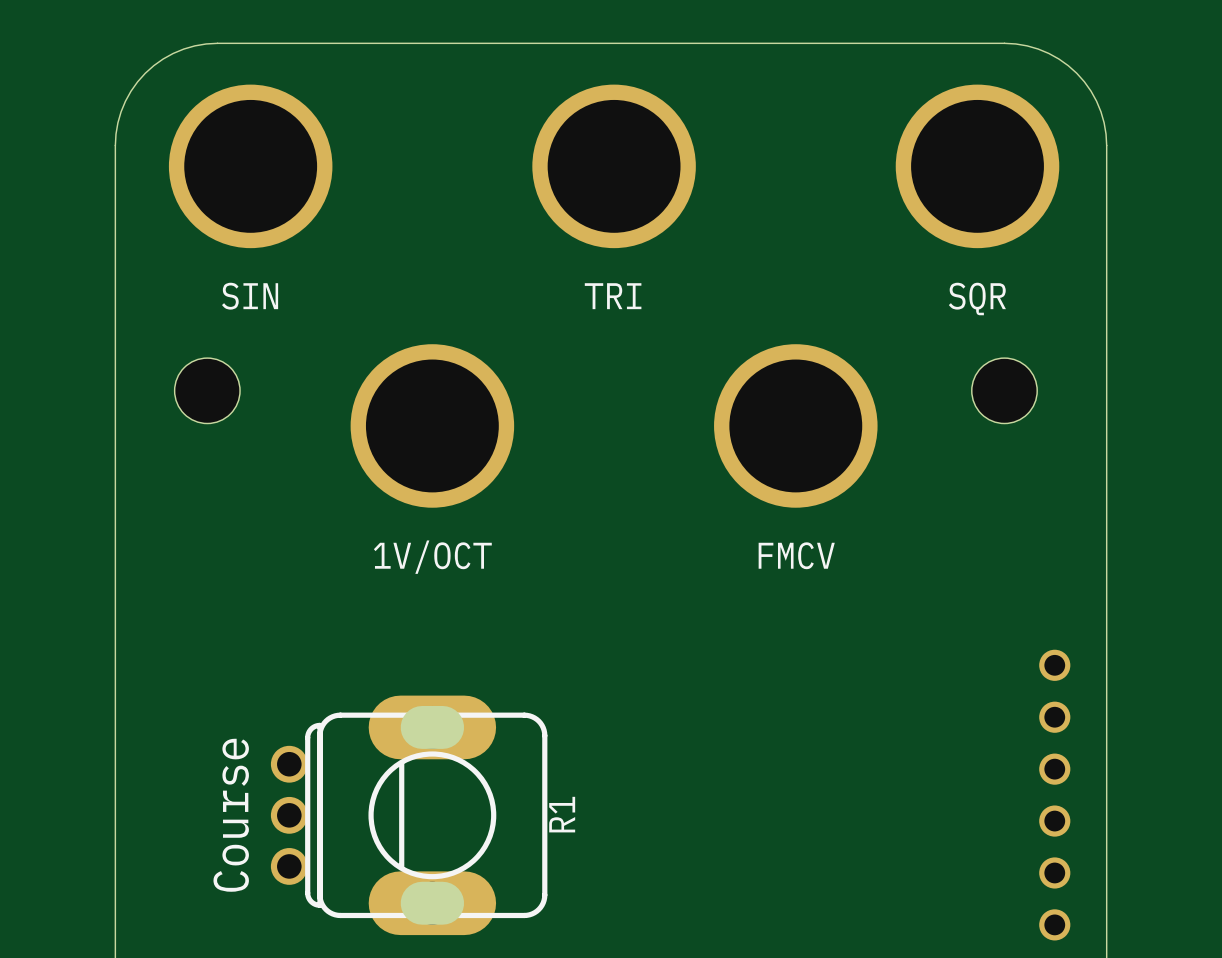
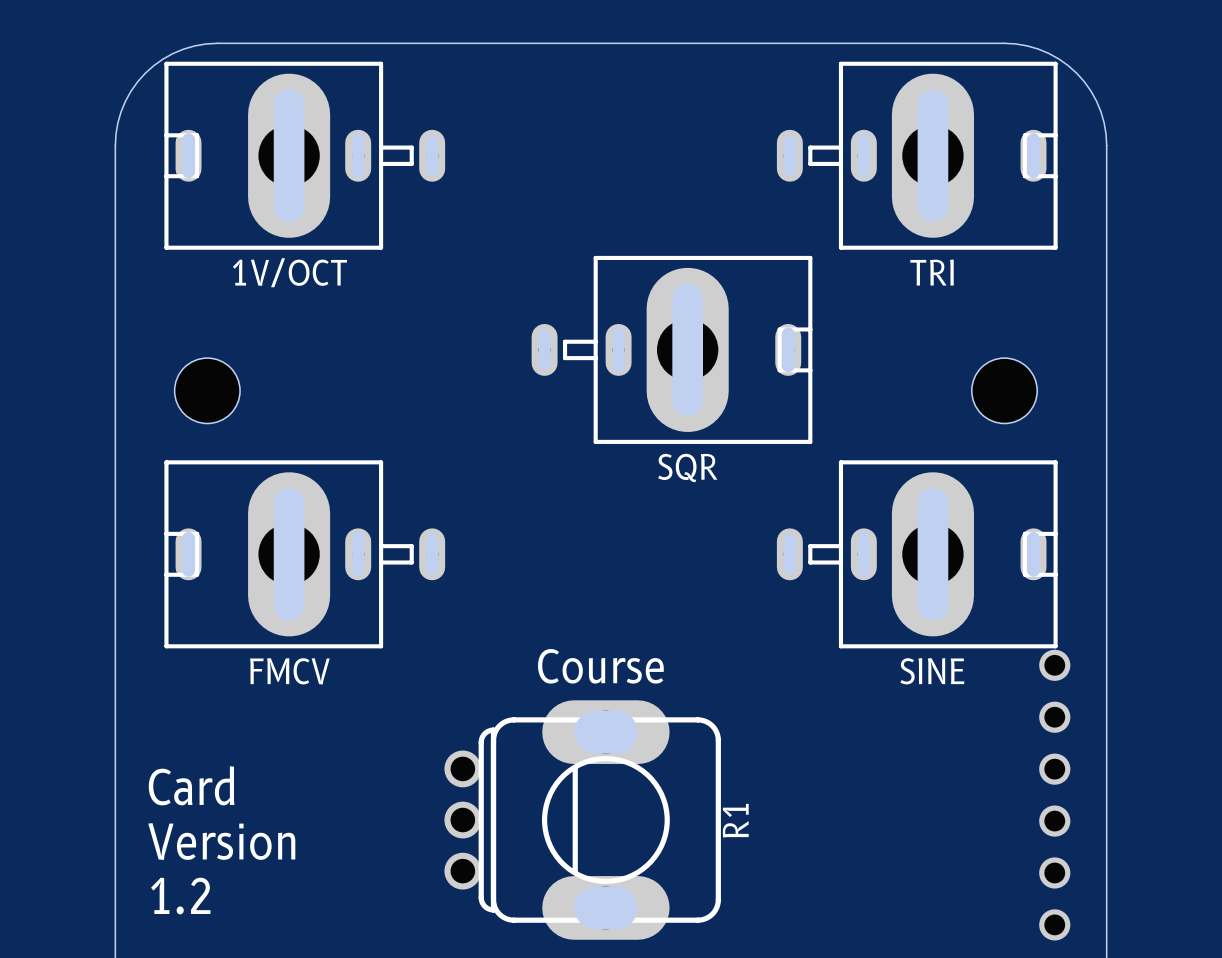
TRI: none -> (917, 155)
SIN: (250, 166) -> none
TRI: (614, 166) -> none
SQR: (977, 166) -> none
1V/OCT footprint: [350, 344, 515, 508] -> [164, 61, 446, 250]
SQR: none -> (671, 349)
FMCV: (795, 425) -> none
FMCV: none -> (304, 554)
SINE: none -> (917, 554)
text: none -> Card (191, 785)
text rotation: 0° (231, 815) -> 90° clockwise (600, 666)
text position: Course (231, 815) -> Course (600, 666)
R1 position: (409, 815) -> (582, 820)
text: none -> Version (221, 841)
text: none -> 1.2 (180, 896)

